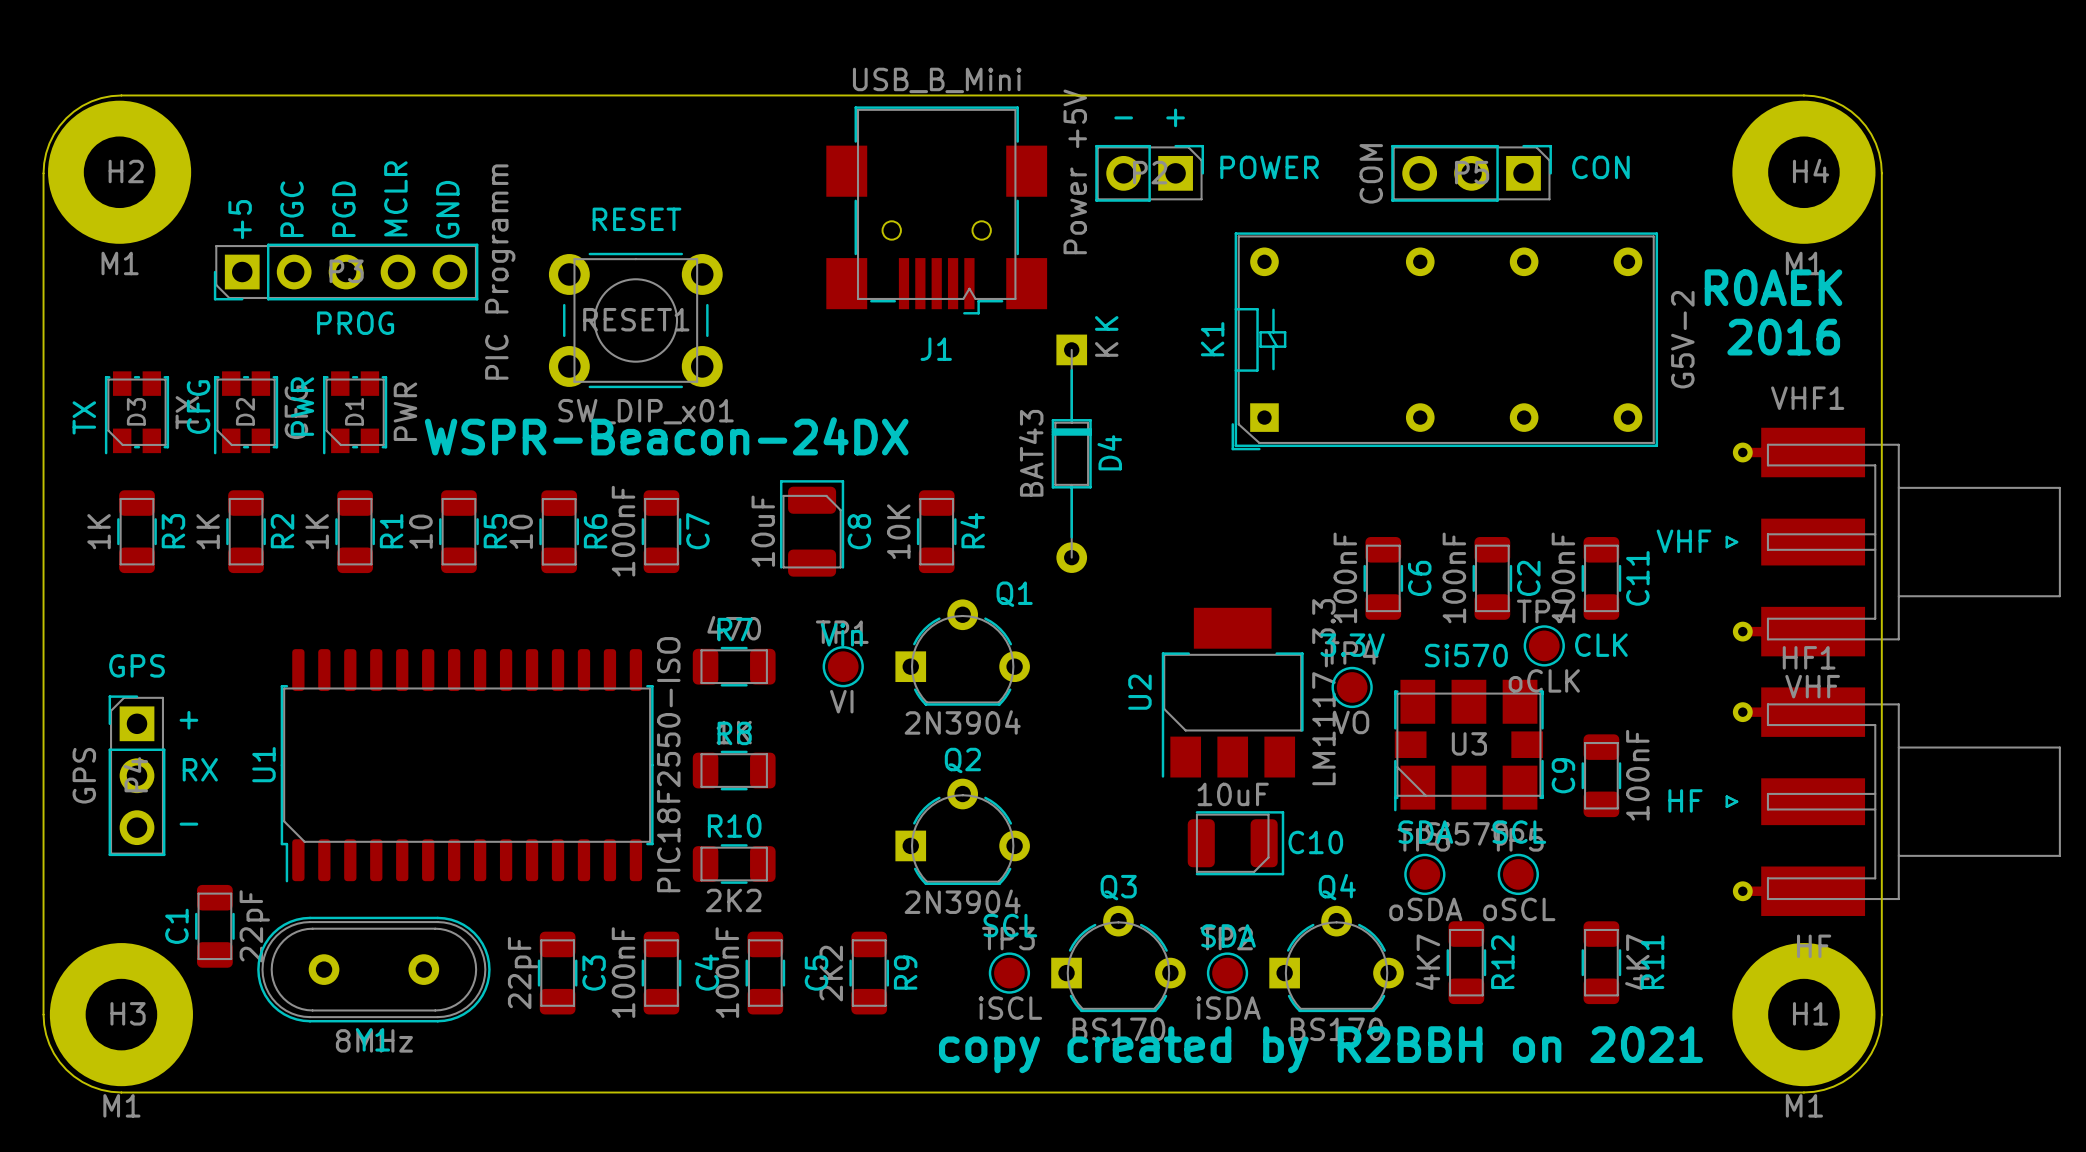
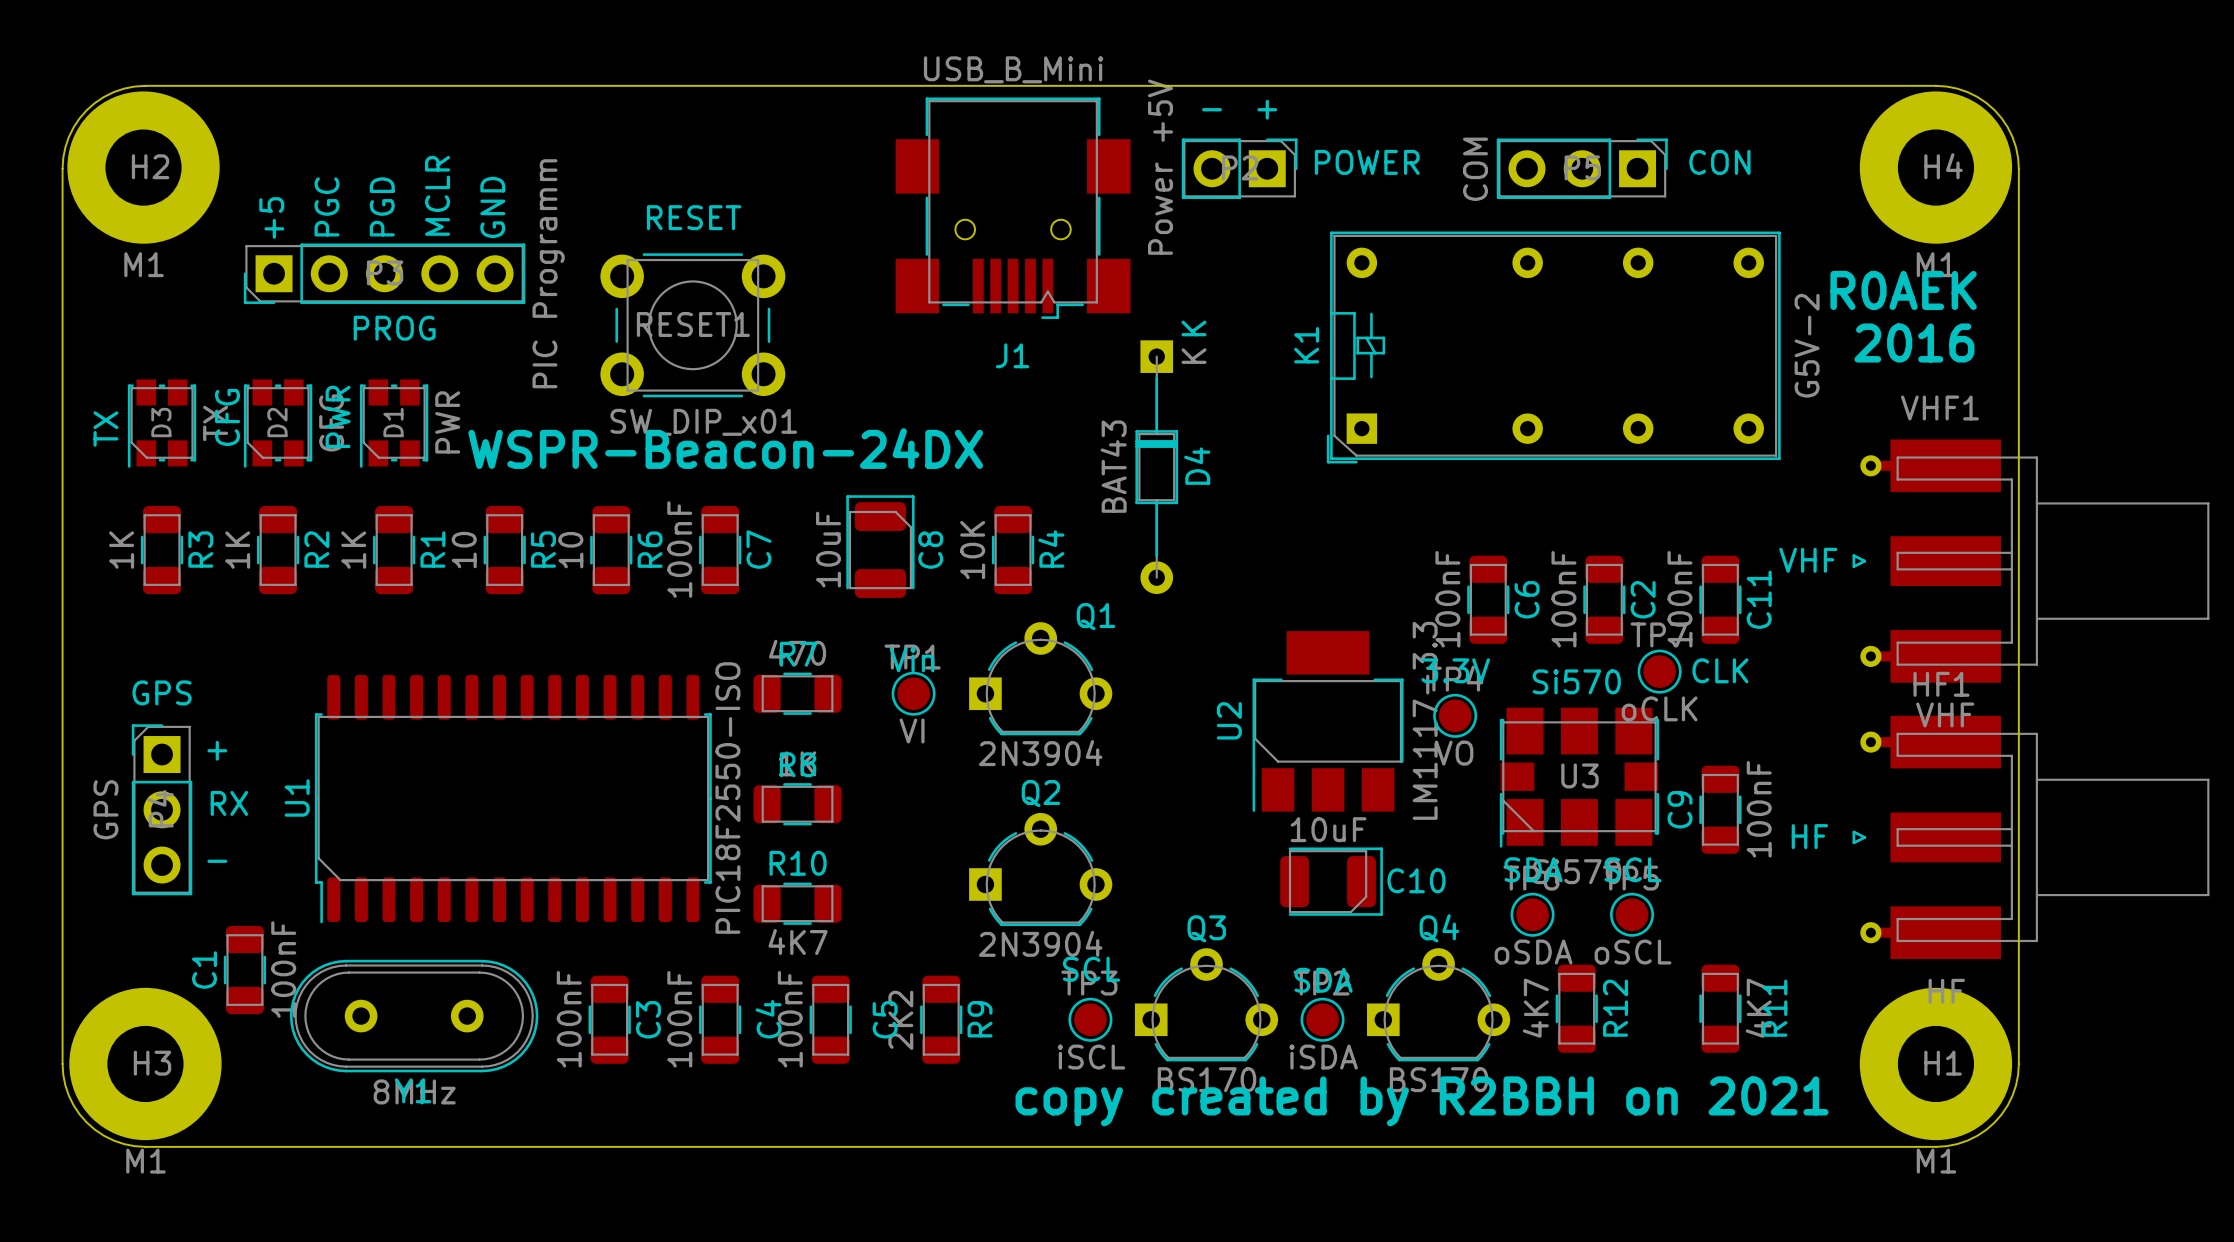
R10 value: 2K2 (733, 900) -> 4K7 (798, 941)
C1 value: 22pF (254, 926) -> 100nF (283, 969)
C3 value: 22pF (523, 973) -> 100nF (569, 1019)

